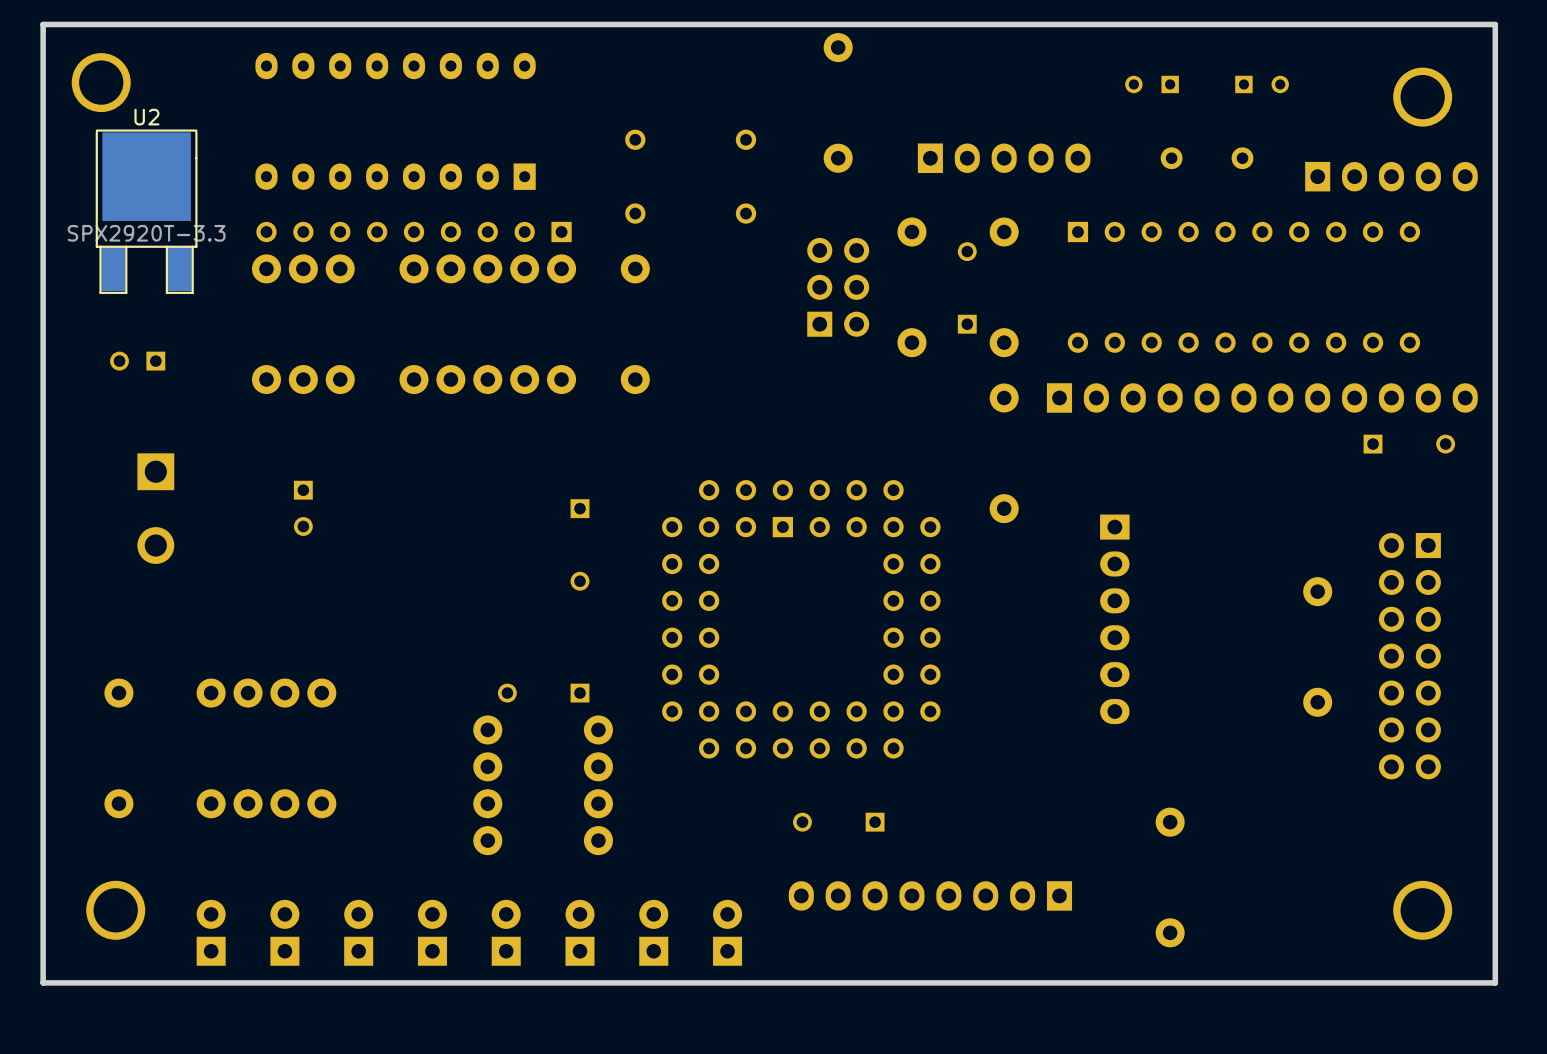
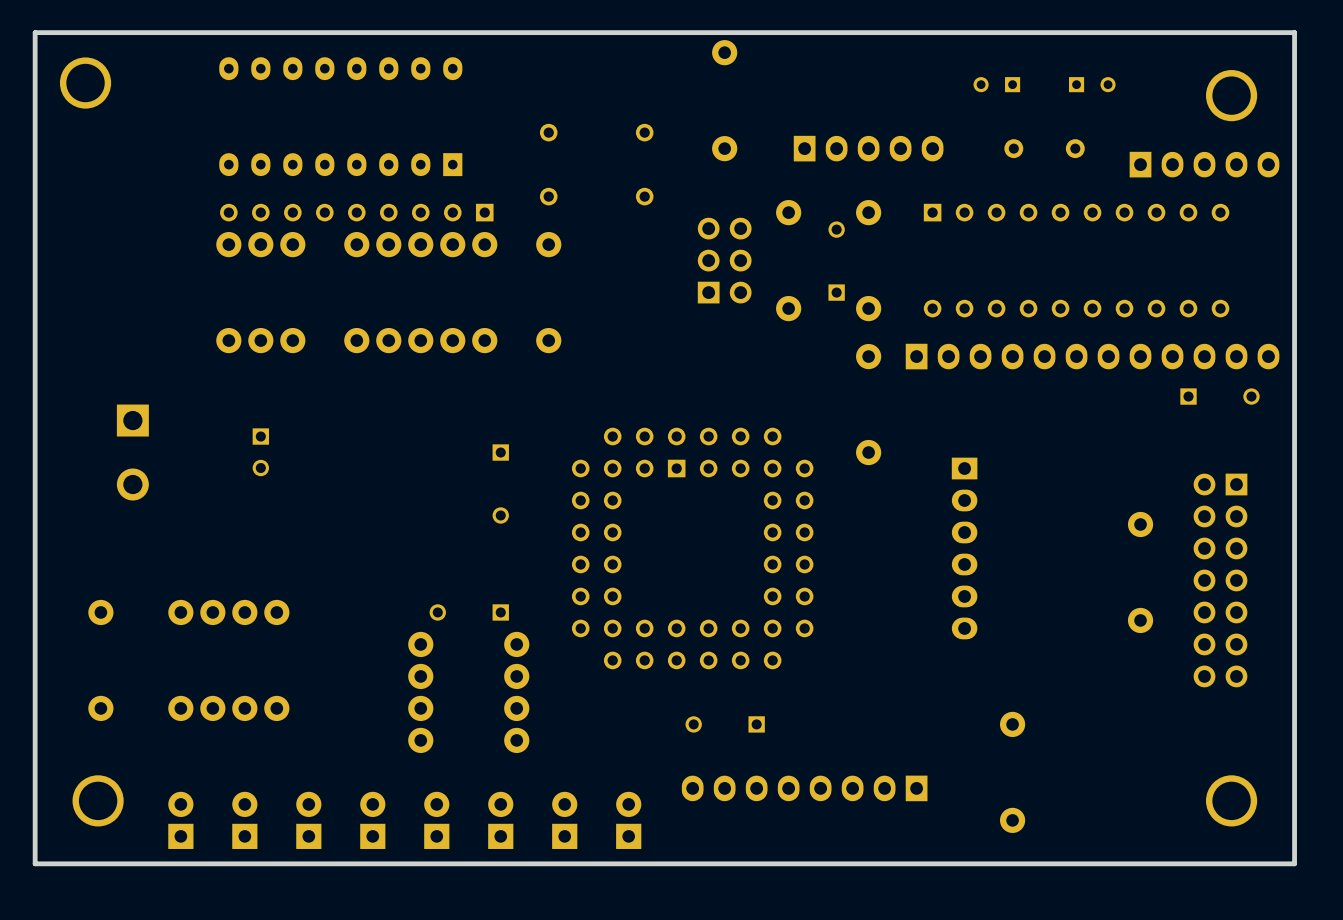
U2: SPX2920T-3.3 (146, 211) -> none
part: (137, 361) -> none

